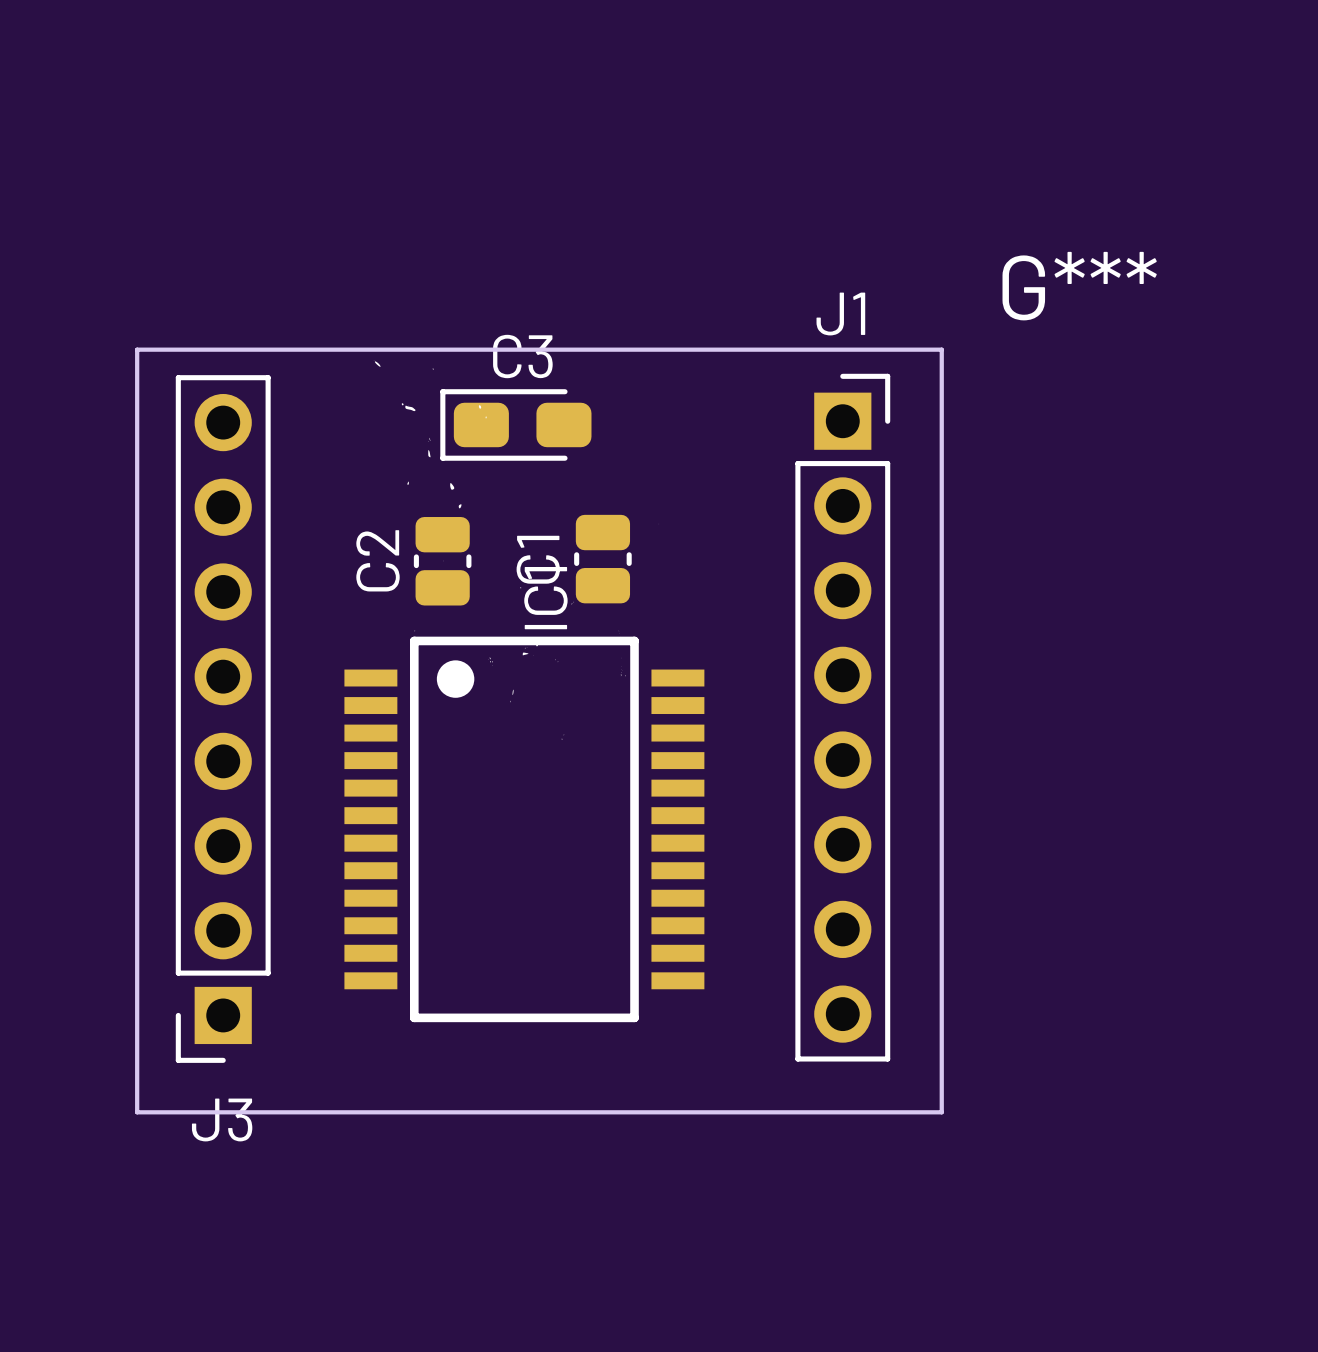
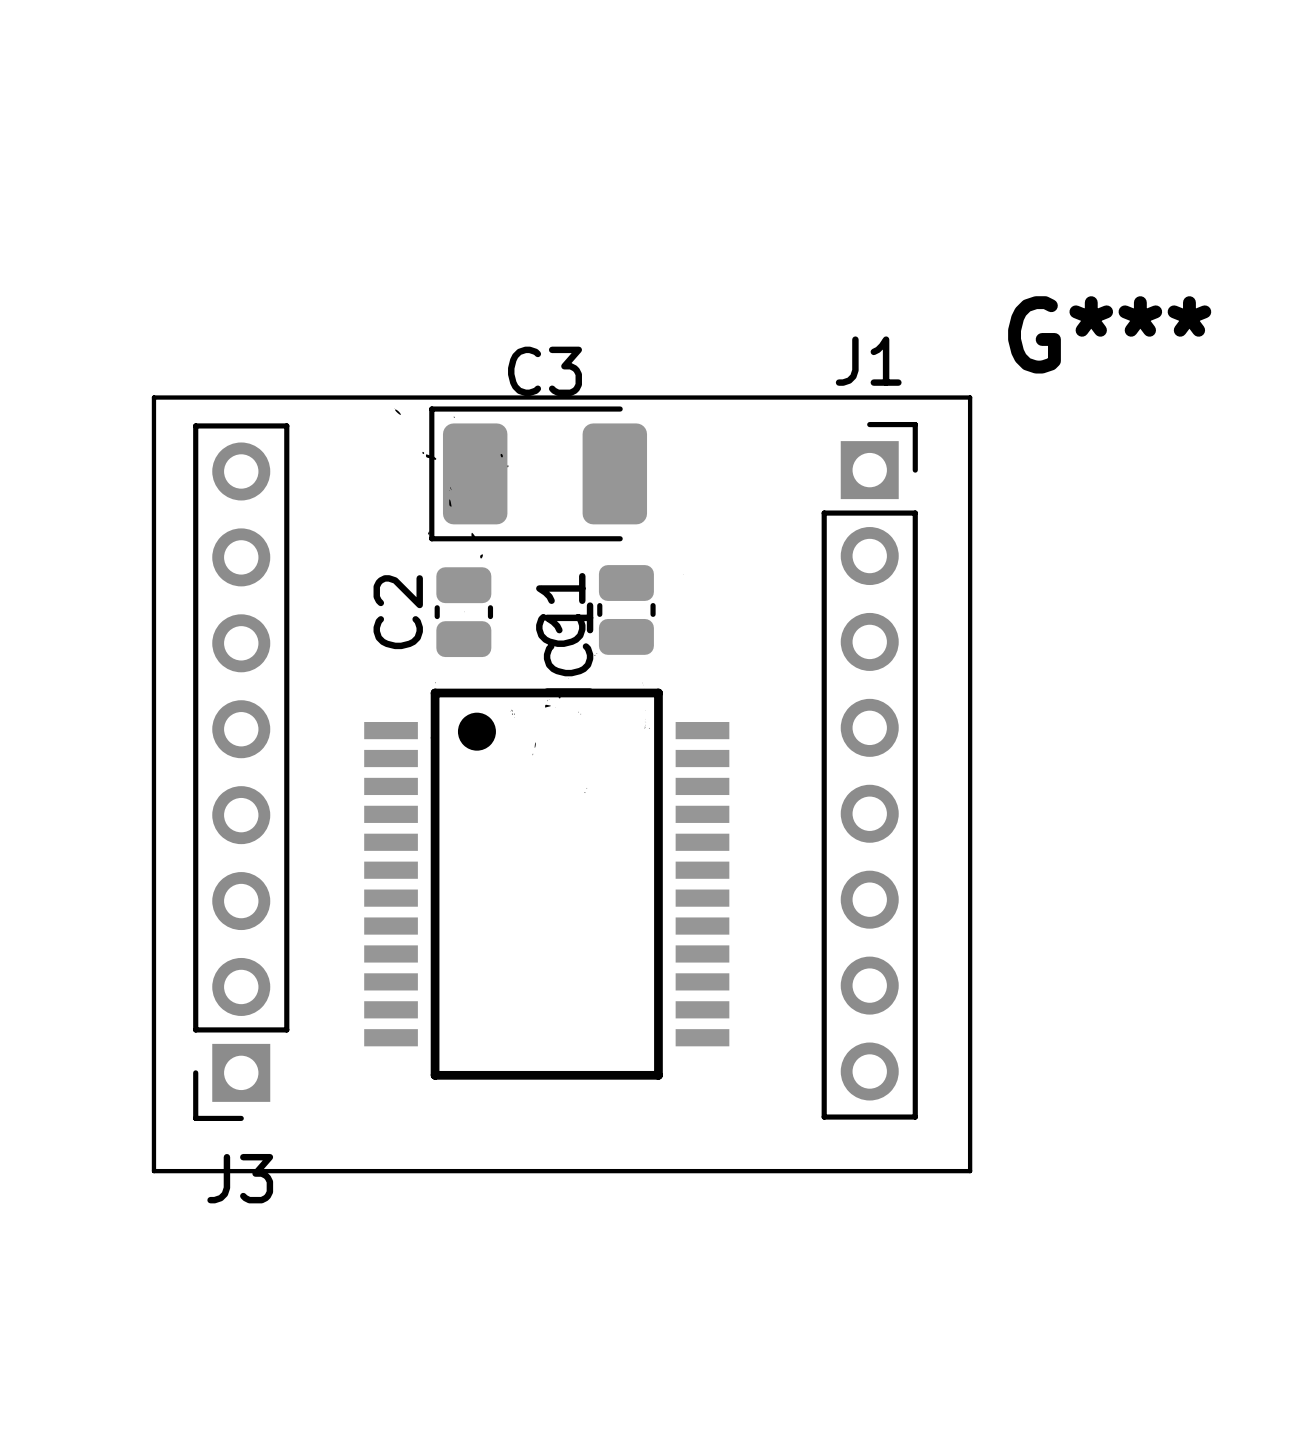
C3 footprint: [440, 389, 592, 461] -> [429, 406, 648, 542]

